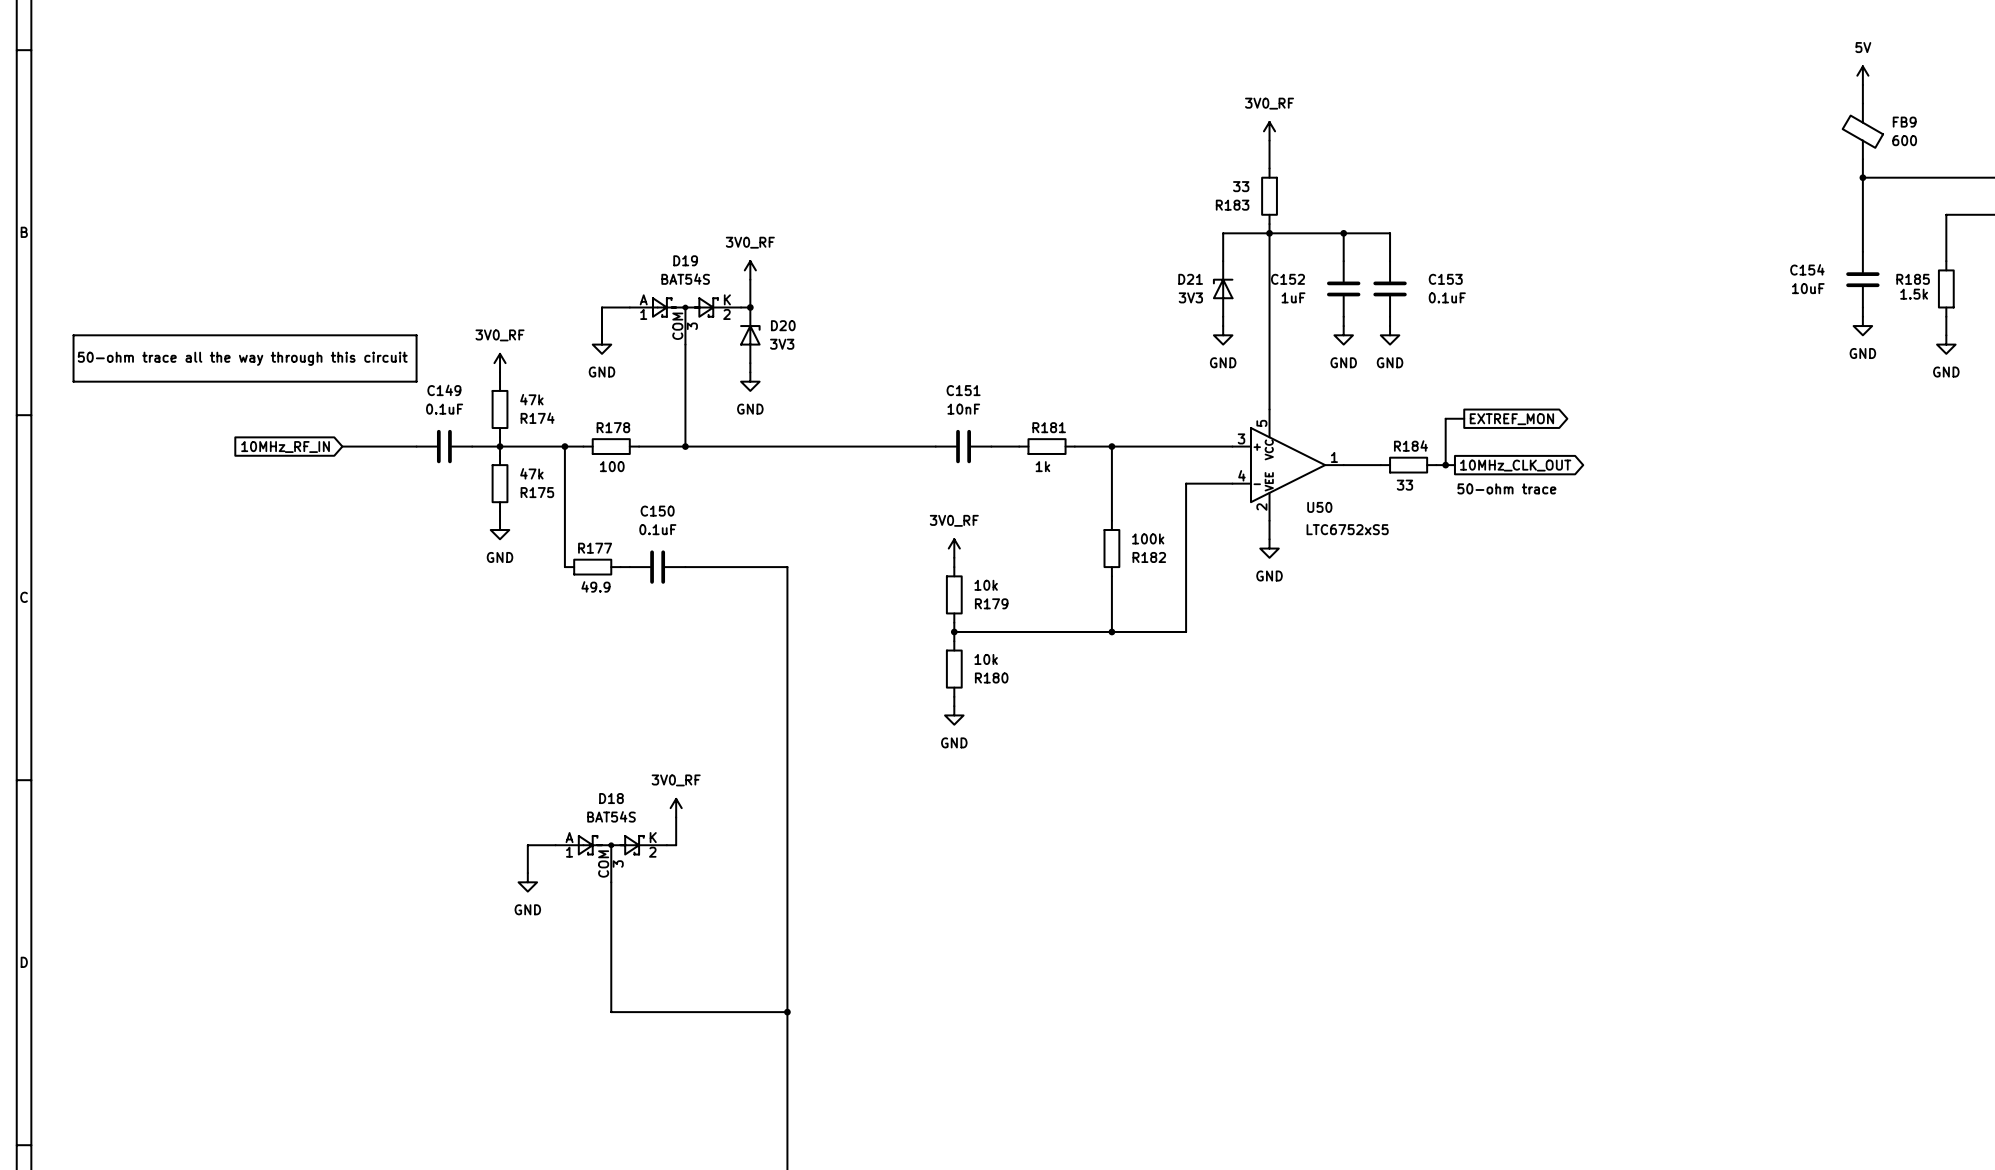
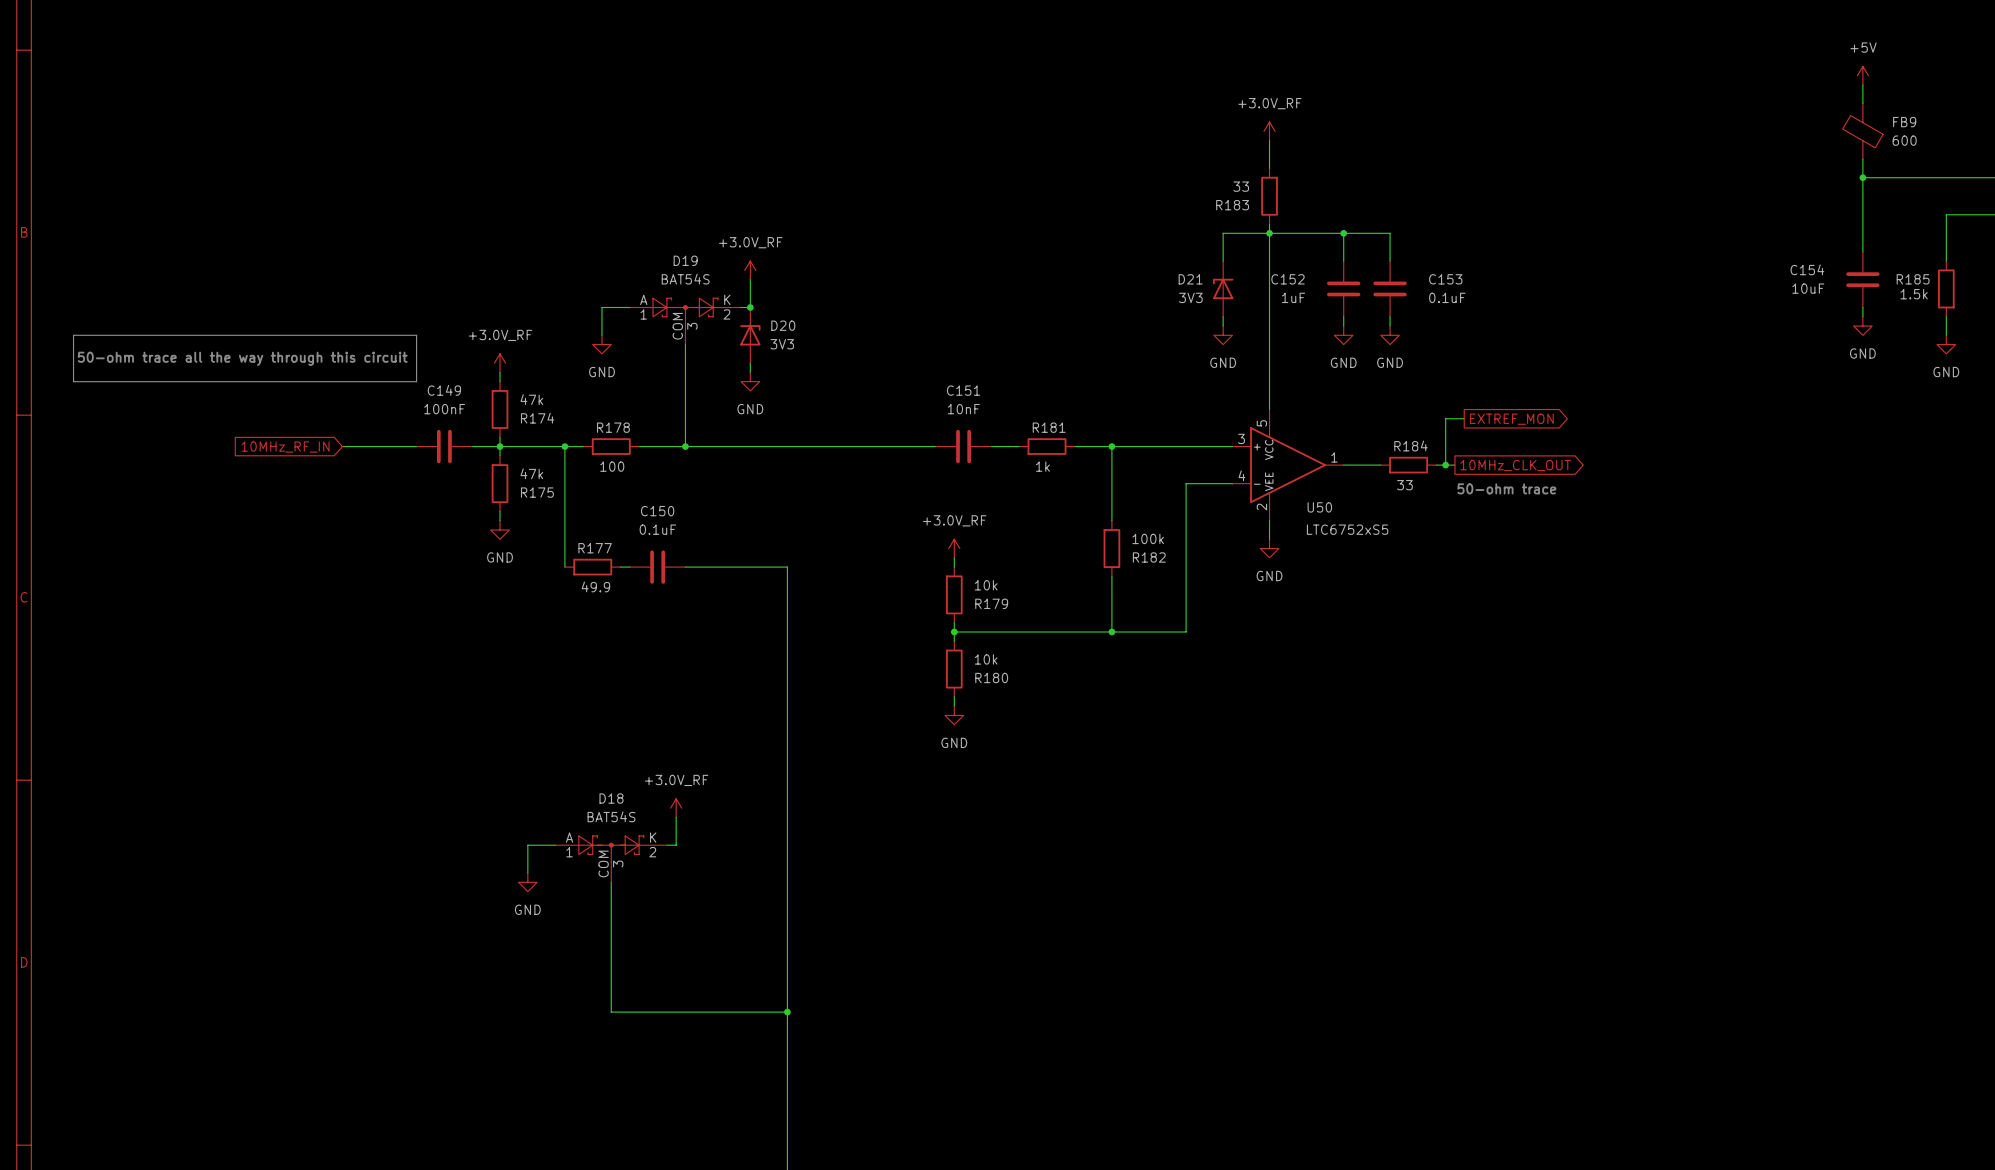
power symbol: 5V (1862, 75) -> +5V (1862, 75)
power symbol: 3V0_RF (1269, 131) -> +3.0V_RF (1269, 131)
power symbol: 3V0_RF (750, 270) -> +3.0V_RF (750, 270)
power symbol: 3V0_RF (500, 363) -> +3.0V_RF (500, 363)
C149 value: 0.1uF (444, 409) -> 100nF (444, 409)
power symbol: 3V0_RF (954, 548) -> +3.0V_RF (954, 548)
power symbol: 3V0_RF (676, 808) -> +3.0V_RF (676, 808)

